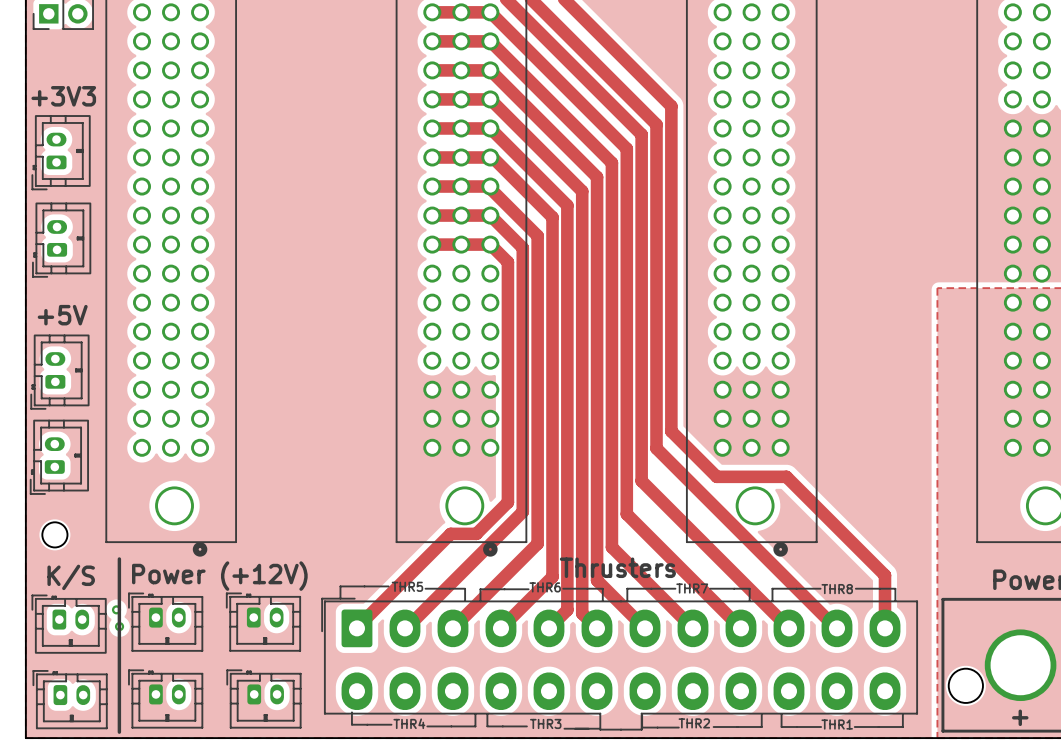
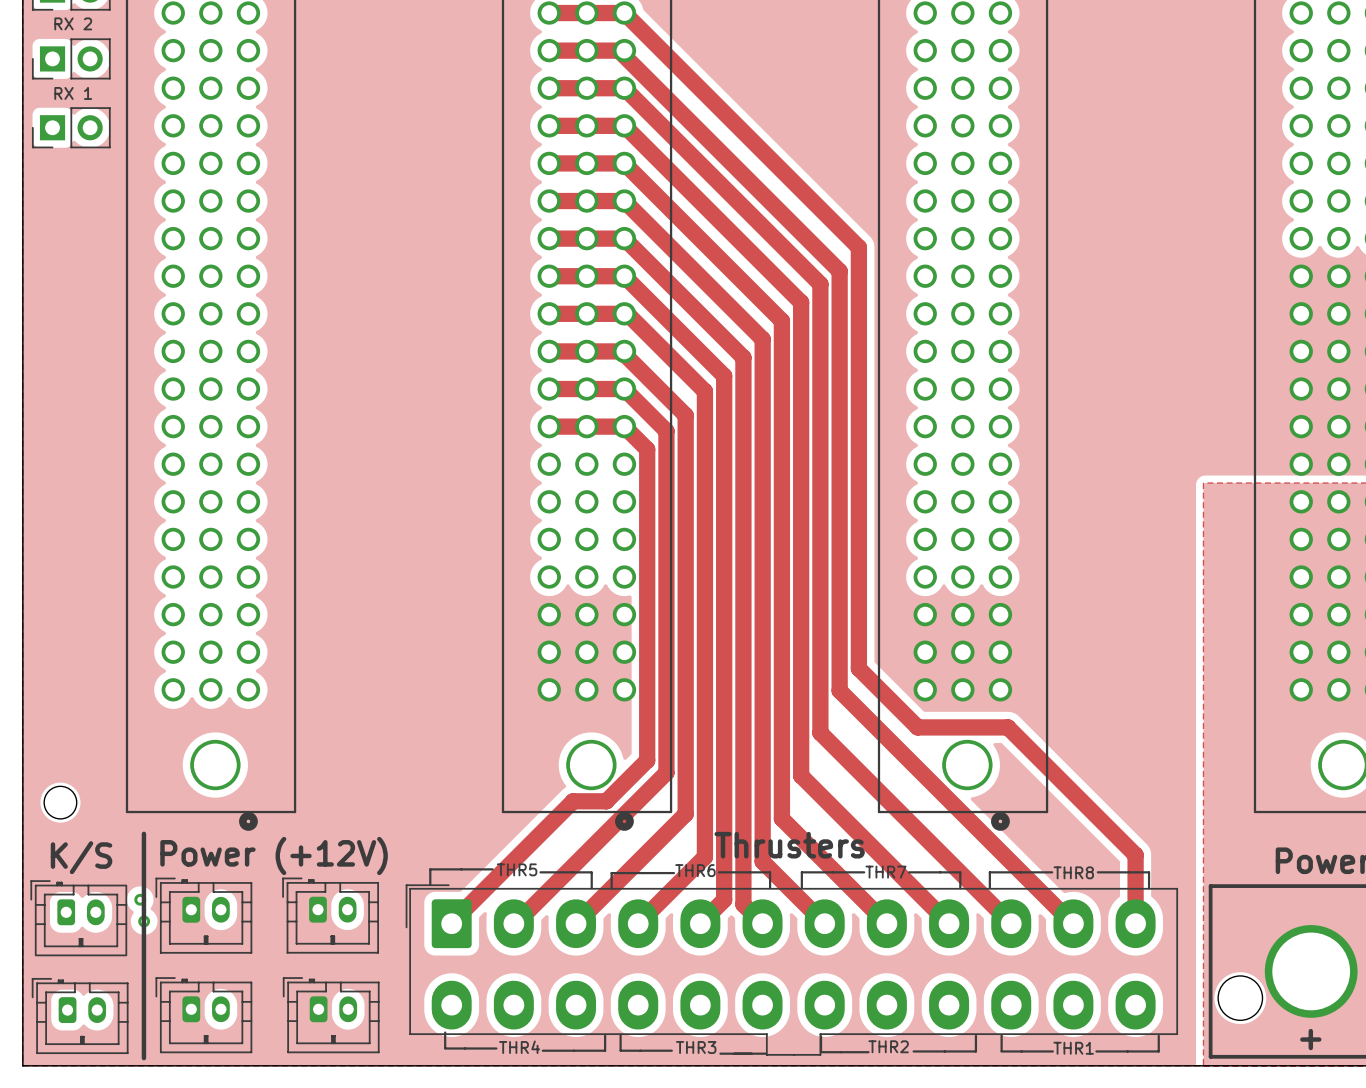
text: +3V3 (63, 96) -> none
part: (61, 152) -> none
part: (61, 240) -> none
text: +5V (62, 315) -> none
part: (59, 372) -> none
part: (59, 457) -> none

